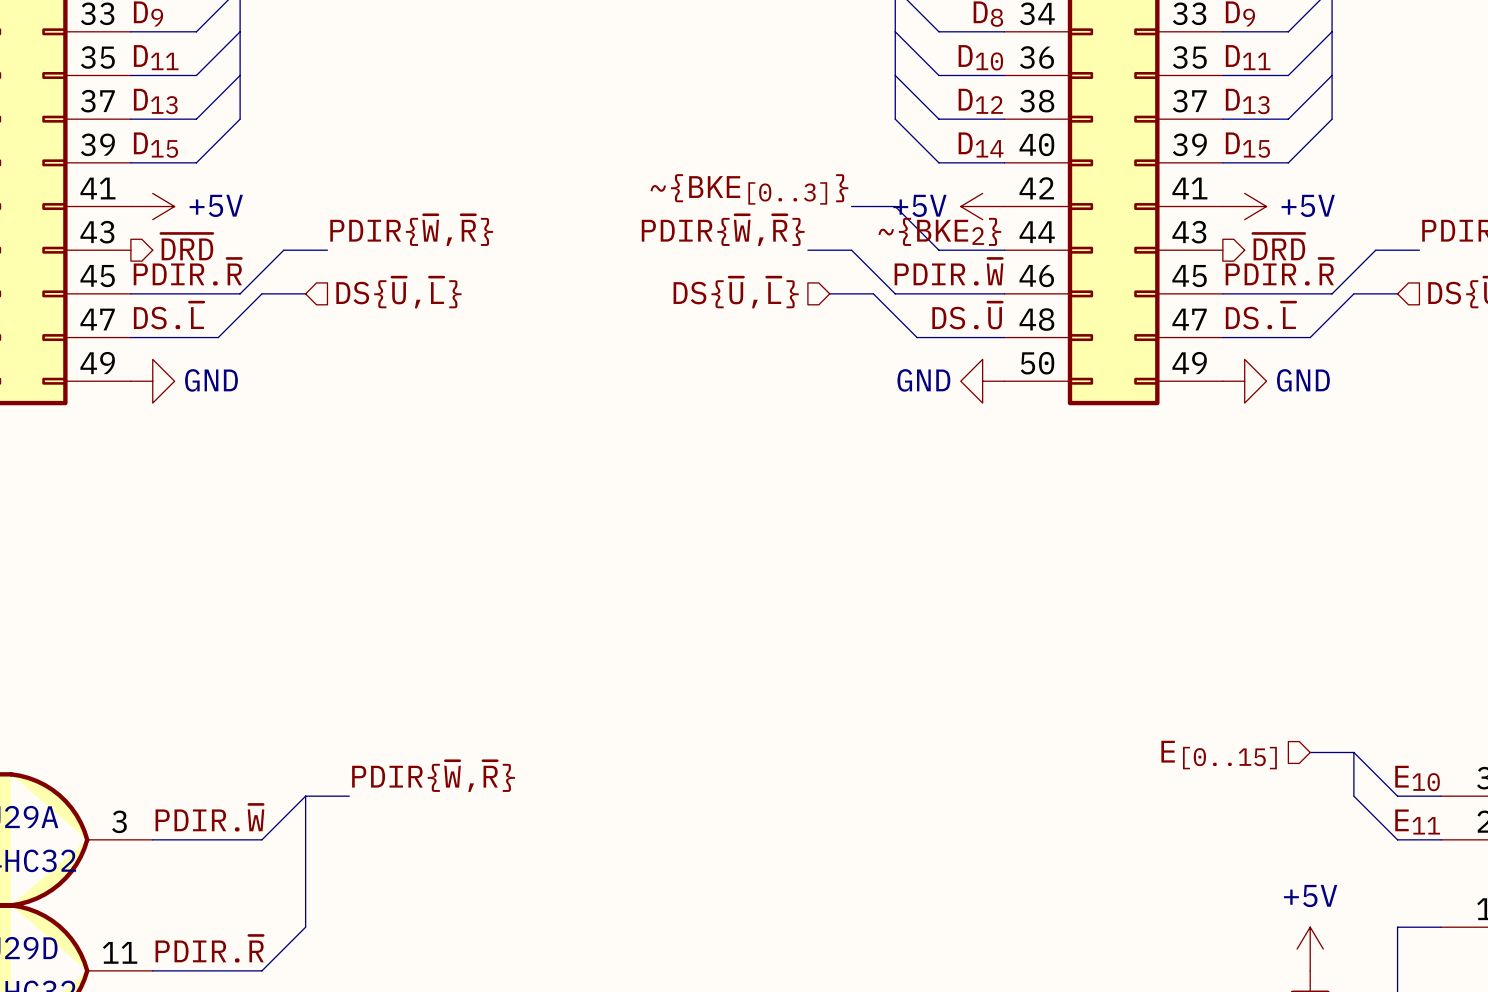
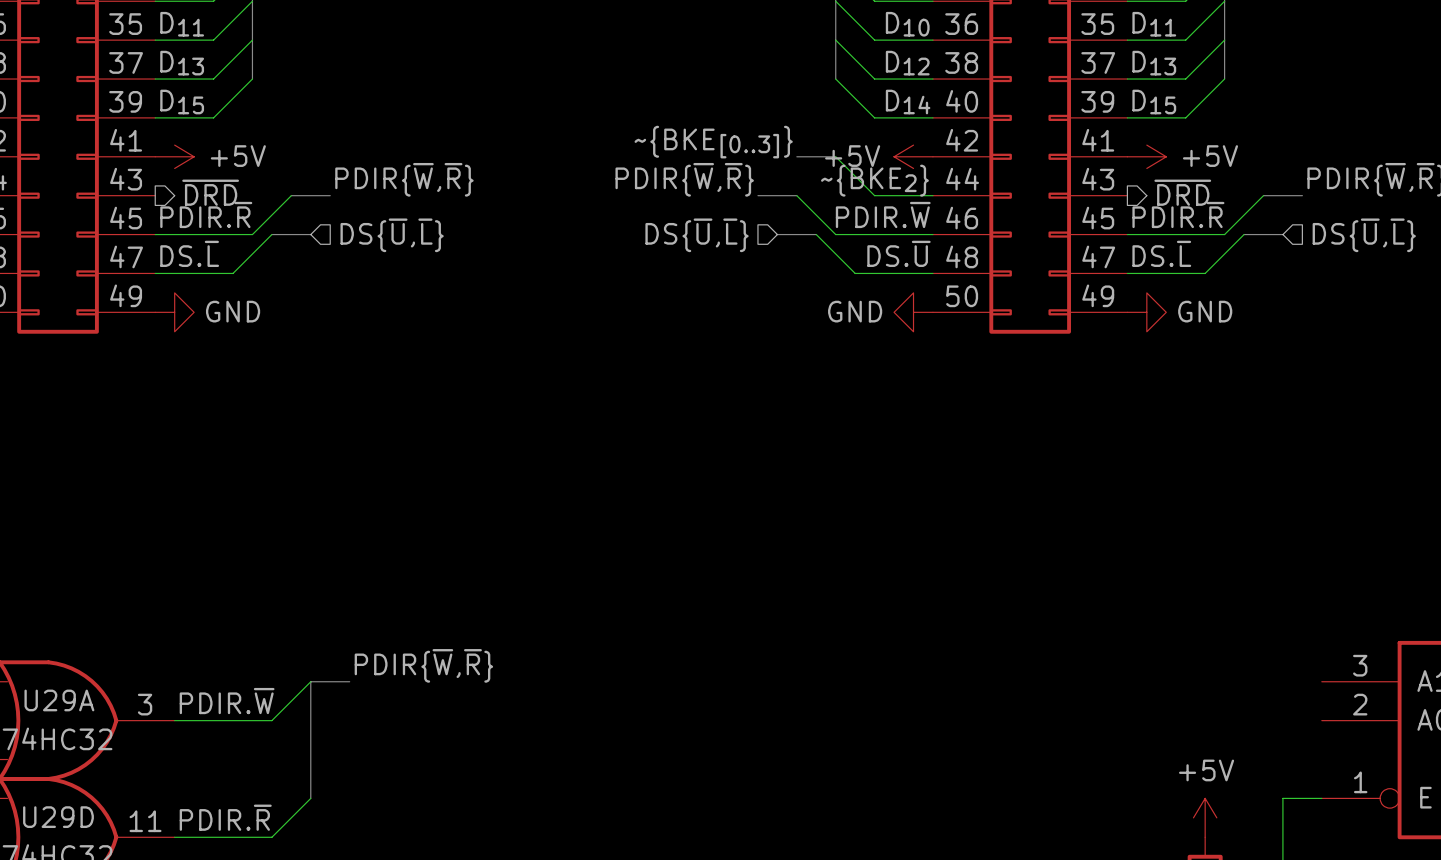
bus: (1310, 752) (1353, 752) (1353, 796) -> none
wire: (1353, 752) (1397, 796) (1441, 796) -> none
hierarchical label: E[0..15] (1219, 755) -> none
label: E10 (1417, 778) -> none
wire: (1353, 796) (1397, 839) (1441, 839) -> none
label: E11 (1417, 822) -> none

